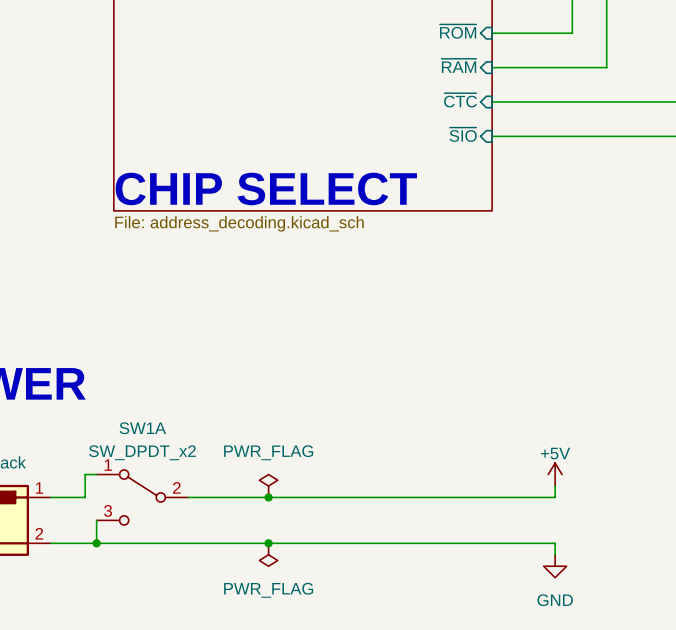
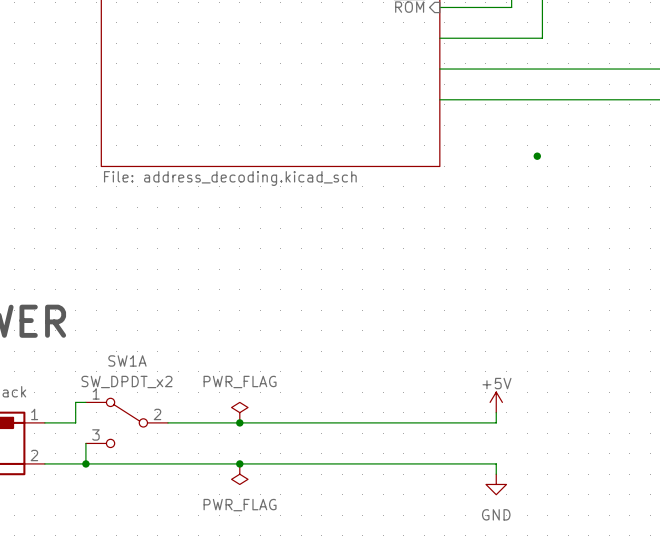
sheet pin: ~{RAM} (459, 65) -> none
sheet pin: ~{CTC} (460, 100) -> none
sheet pin: ~{SIO} (463, 134) -> none
text: CHIP SELECT (266, 188) -> none
junction: none -> (537, 156)

